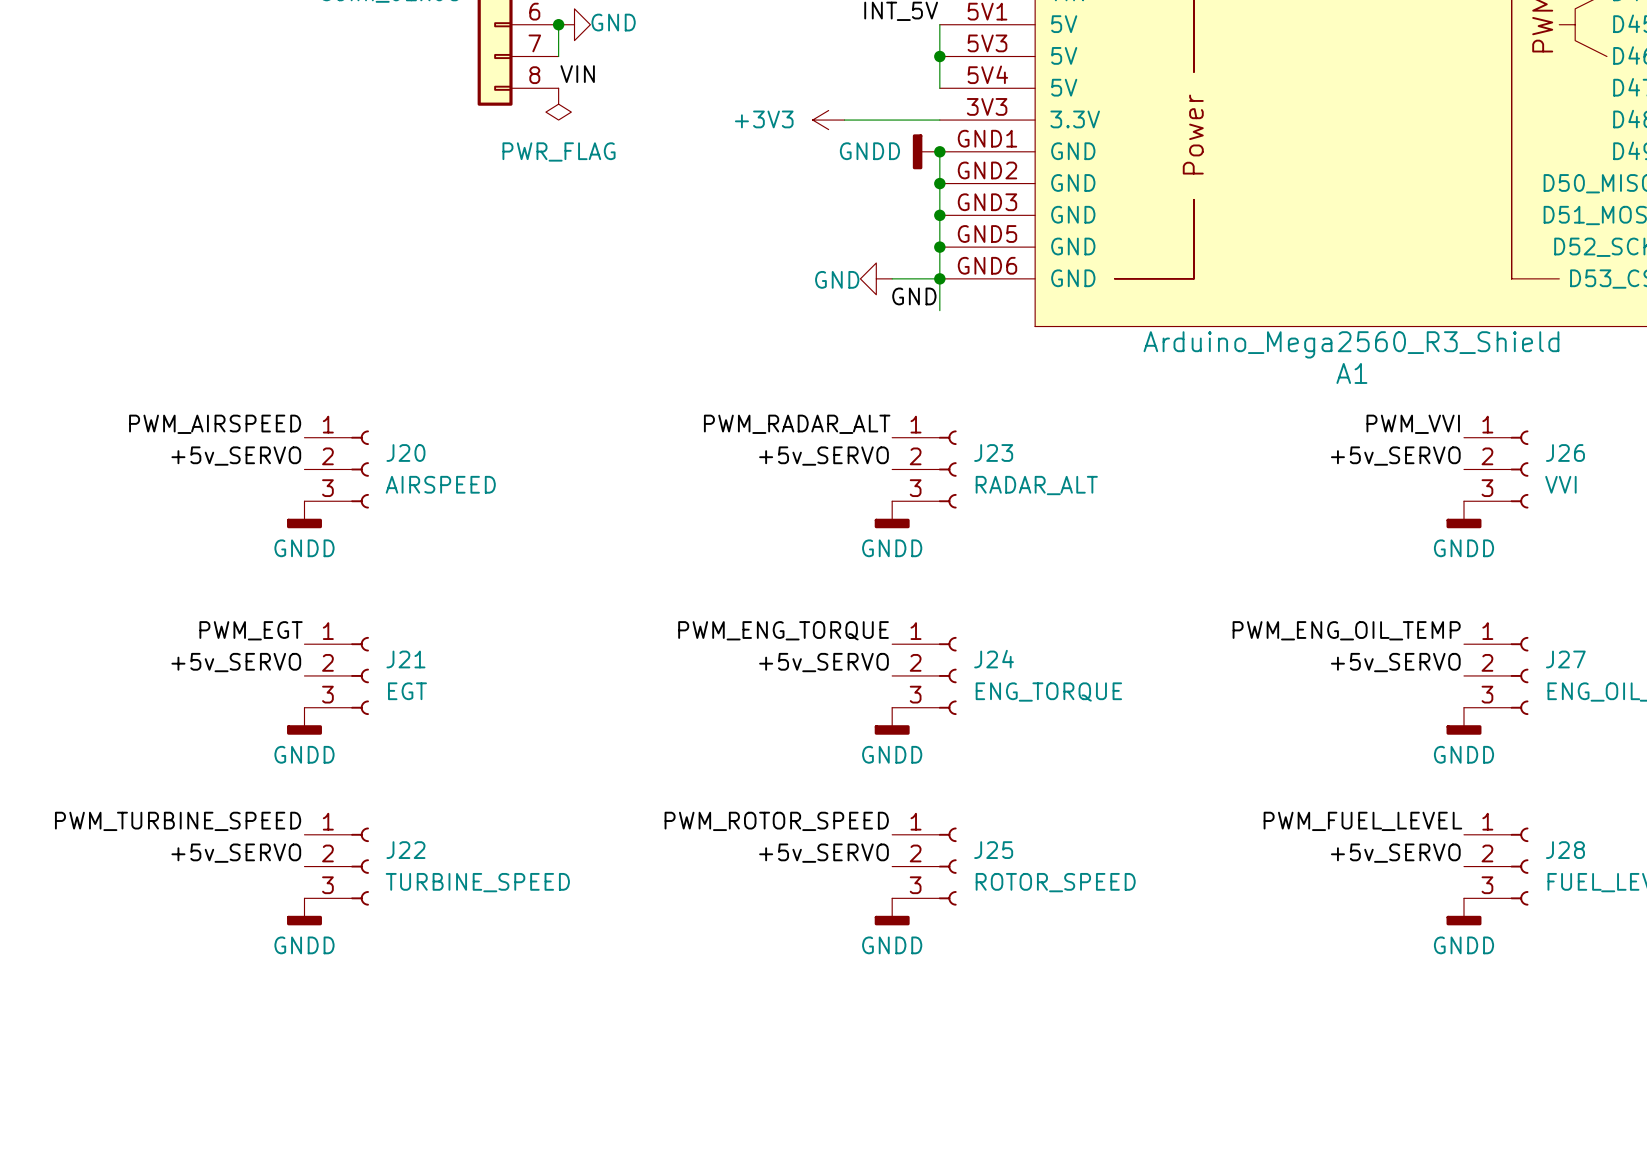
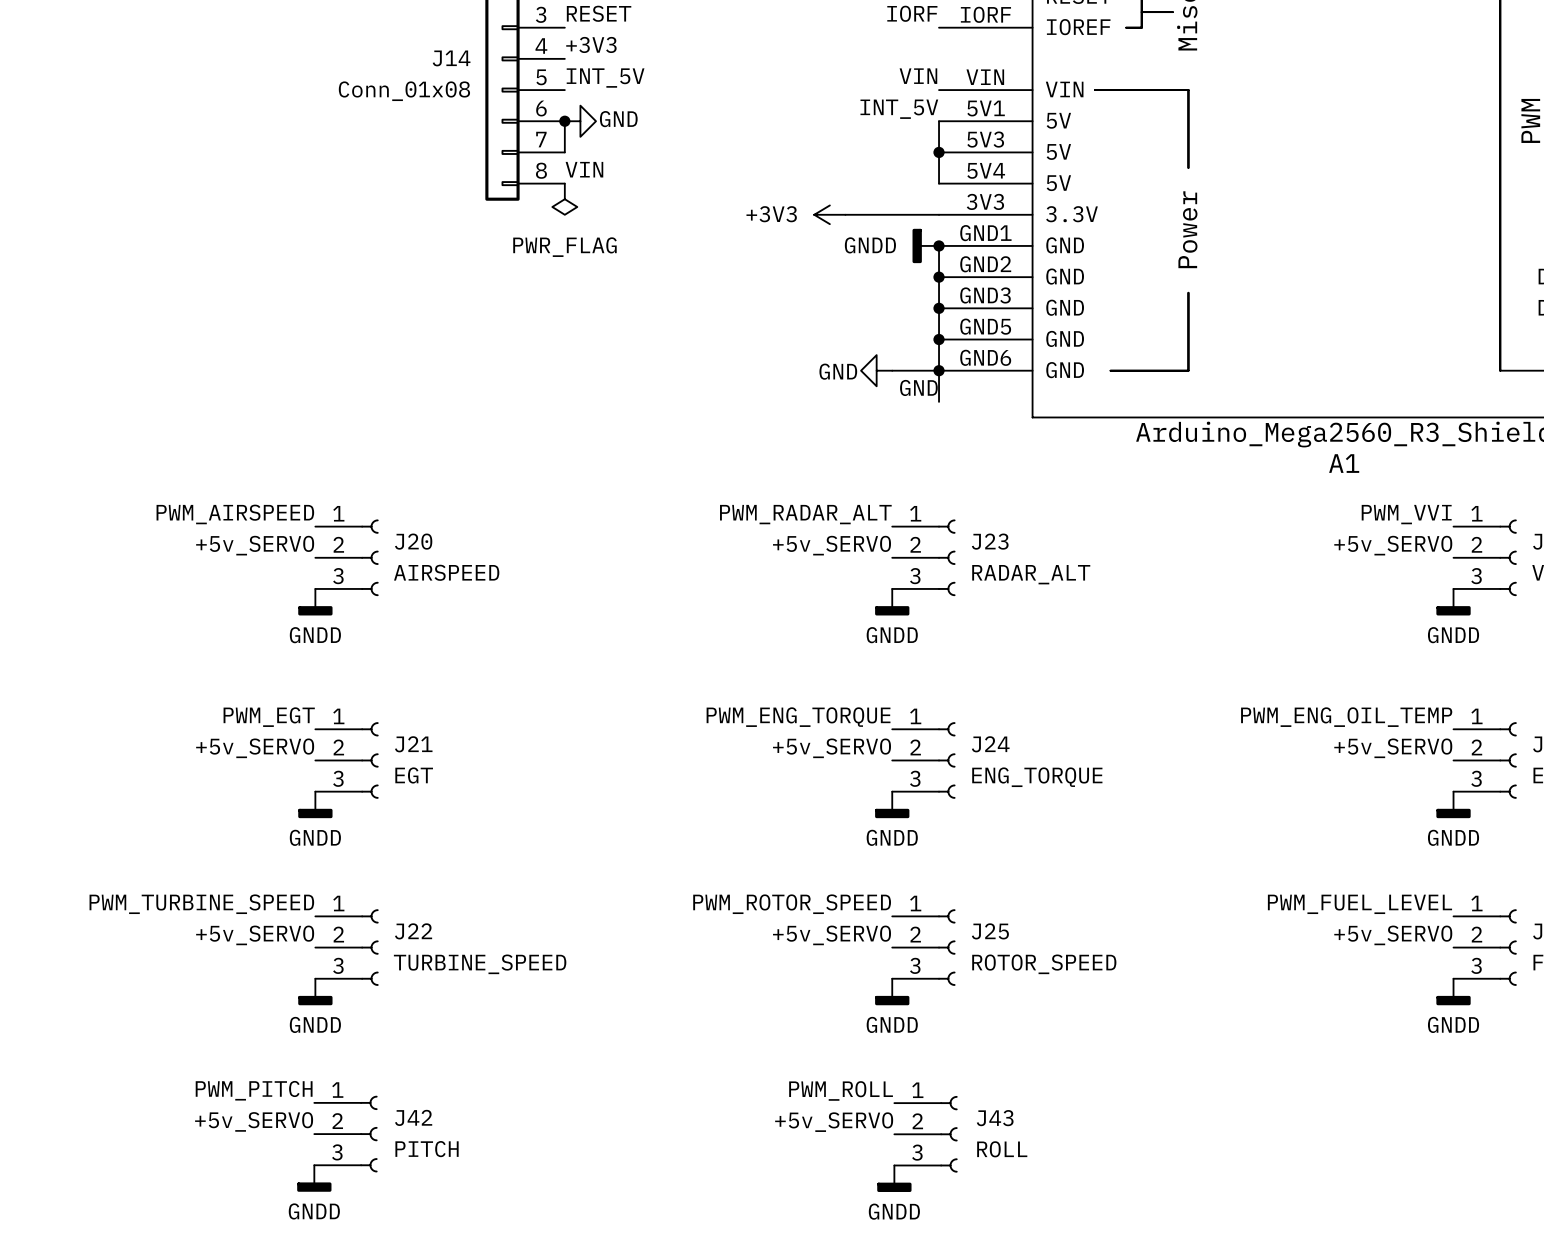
label: none -> PWM_PITCH (254, 1090)
label: none -> PWM_ROLL (841, 1090)
label: none -> +5v_SERVO (254, 1121)
label: none -> +5v_SERVO (834, 1122)
J42: none -> PITCH (345, 1134)
J43: none -> ROLL (926, 1134)
power symbol: none -> GNDD (314, 1178)
power symbol: none -> GNDD (894, 1178)

